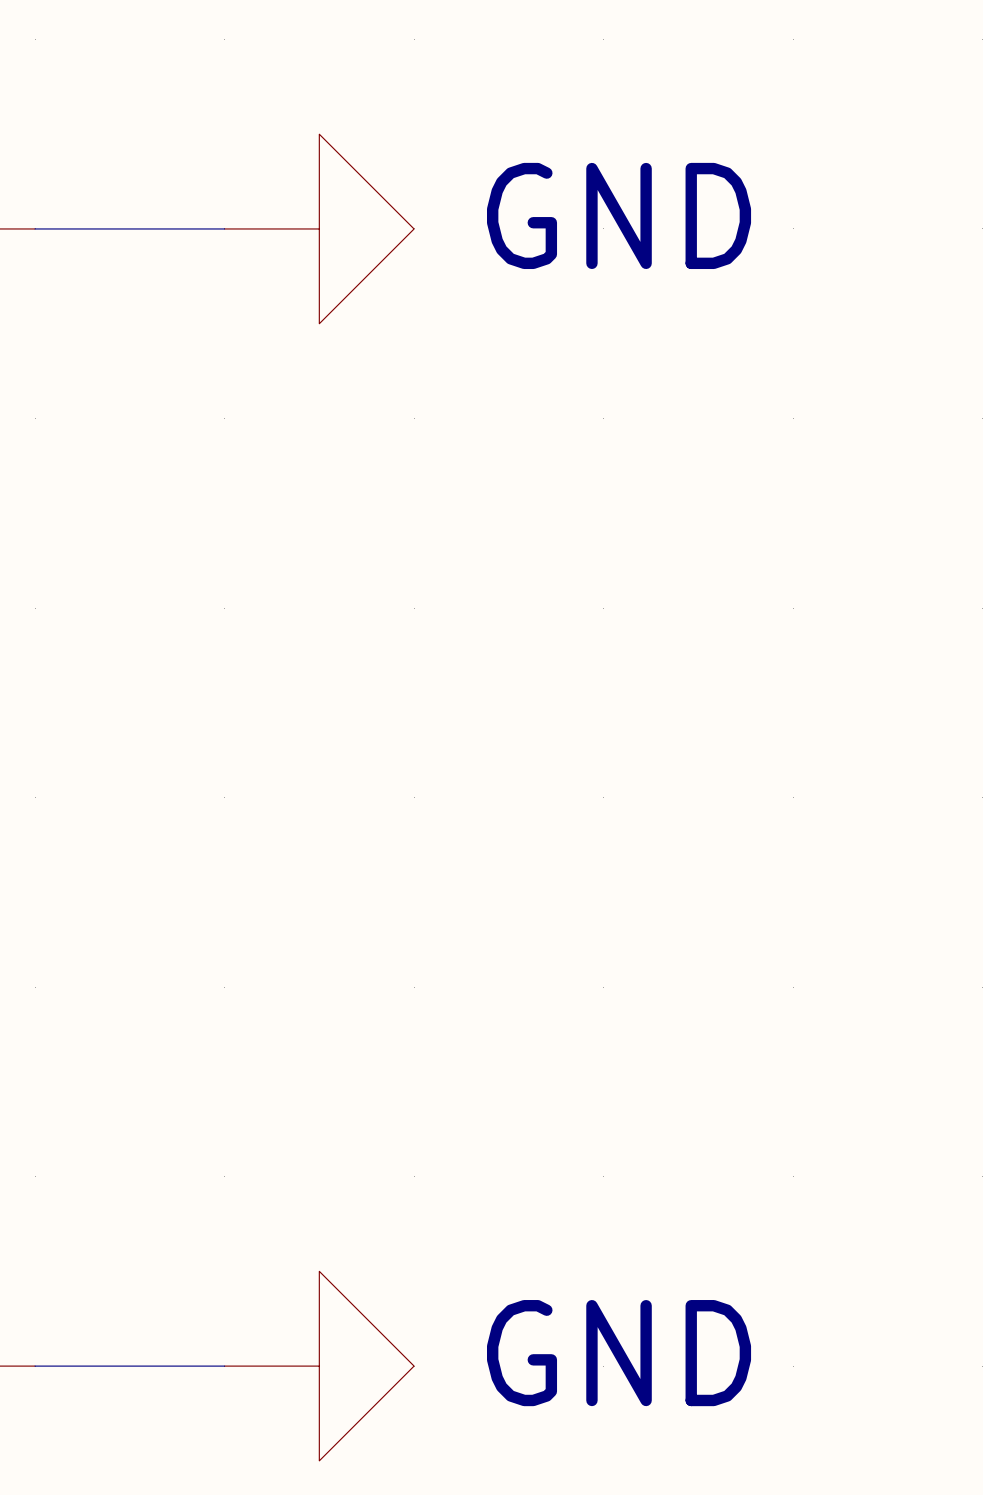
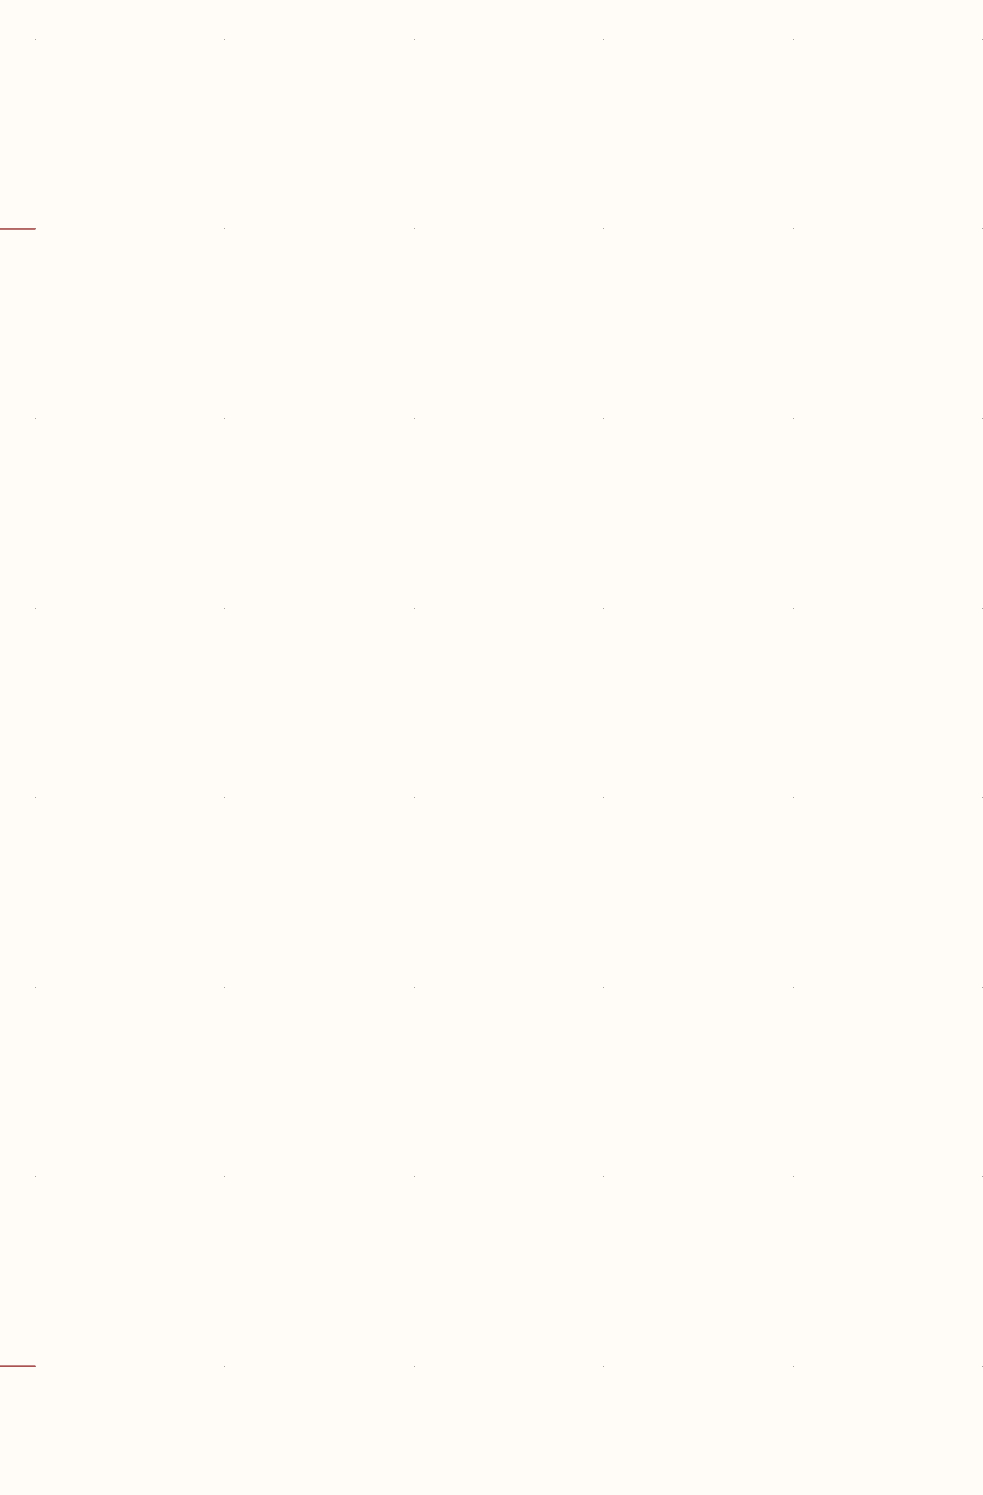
wire: (35, 228) (224, 228) -> none
power symbol: GND (319, 228) -> none
wire: (35, 1366) (224, 1366) -> none
power symbol: GND (319, 1366) -> none

